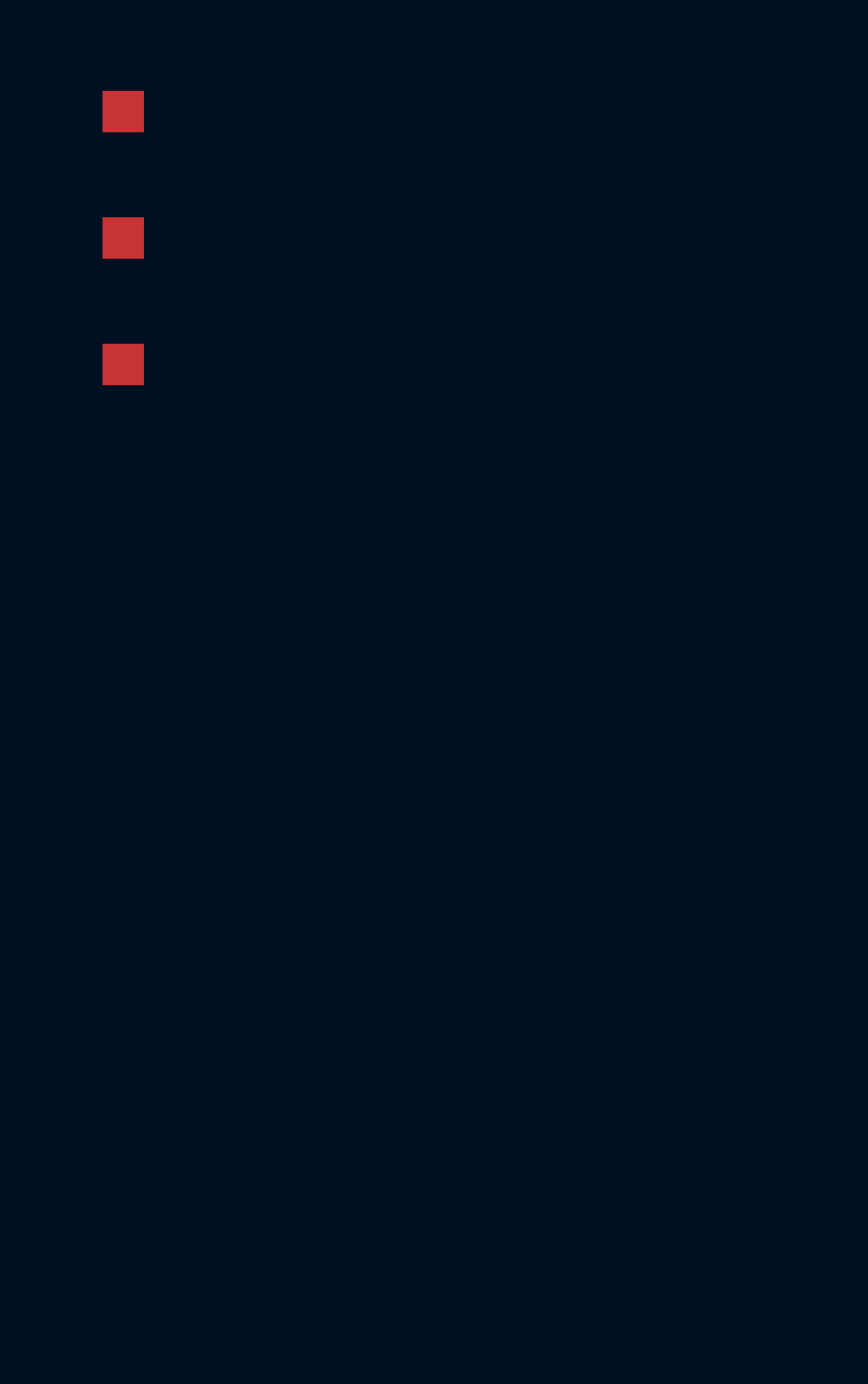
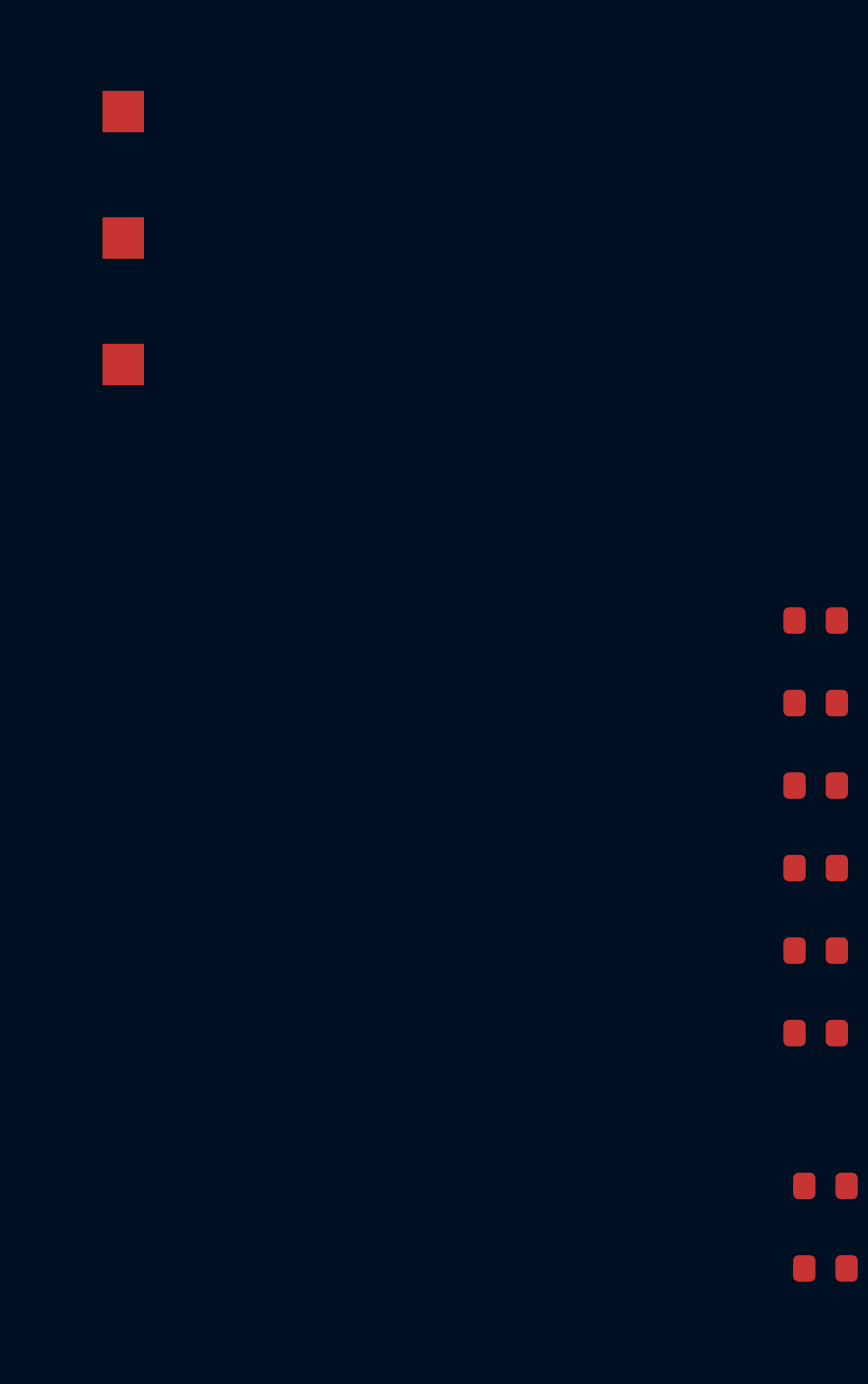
part: none -> (815, 620)
part: none -> (815, 703)
part: none -> (815, 785)
part: none -> (815, 868)
part: none -> (815, 950)
part: none -> (815, 1033)
part: none -> (825, 1185)
part: none -> (825, 1268)

